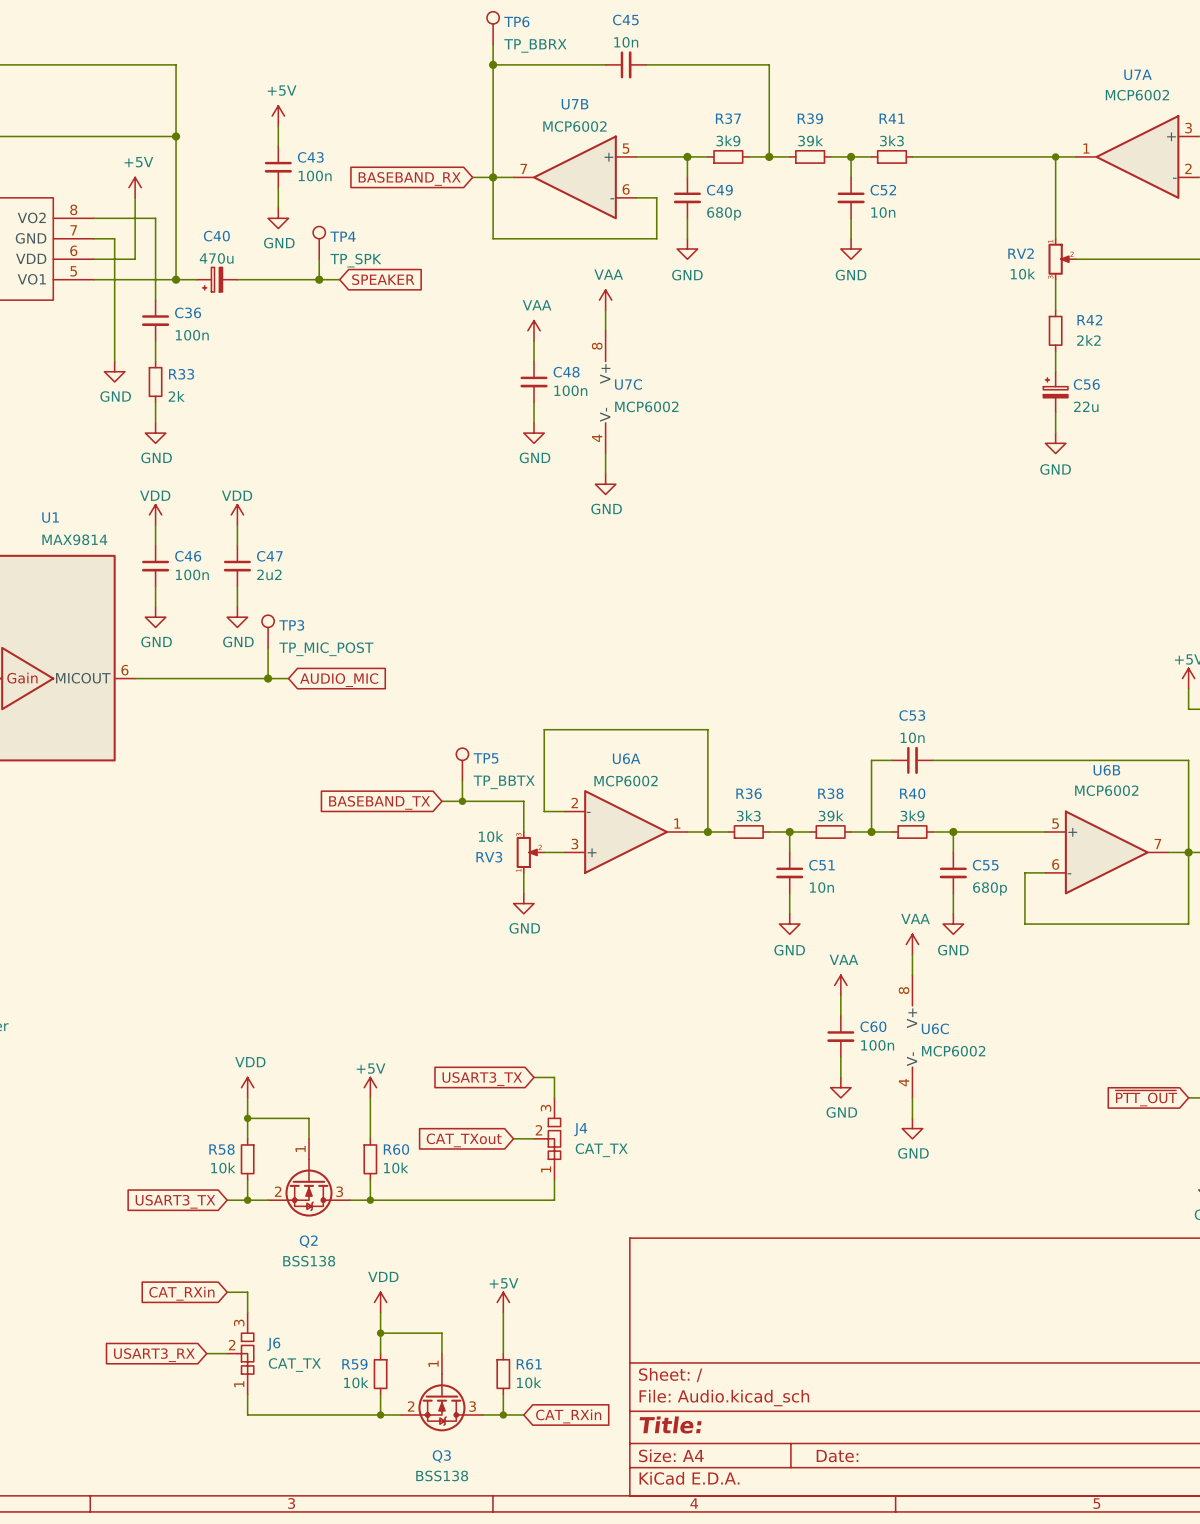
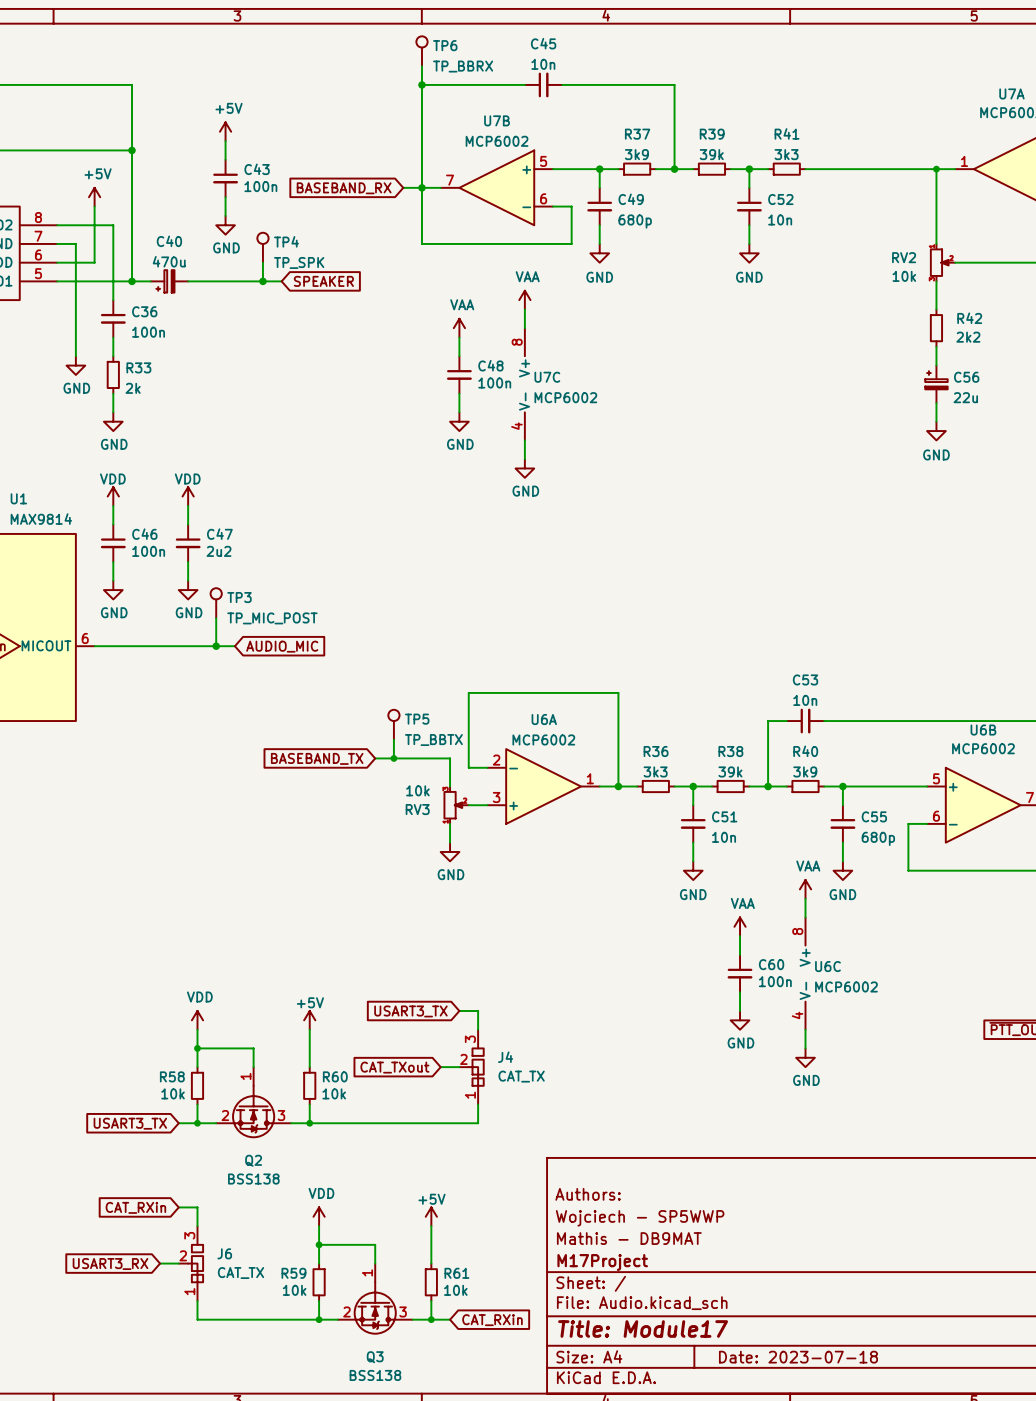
title block: none -> Authors: (588, 1194)
title block: none -> Wojciech - SP5WWP (640, 1218)
title block: none -> Mathis - DB9MAT (629, 1238)
title block: none -> M17Project (602, 1262)
title block: Title: (670, 1424) -> Title: Module17 (643, 1329)
title block: Date: (837, 1456) -> Date: 2023-07-18 (798, 1357)

